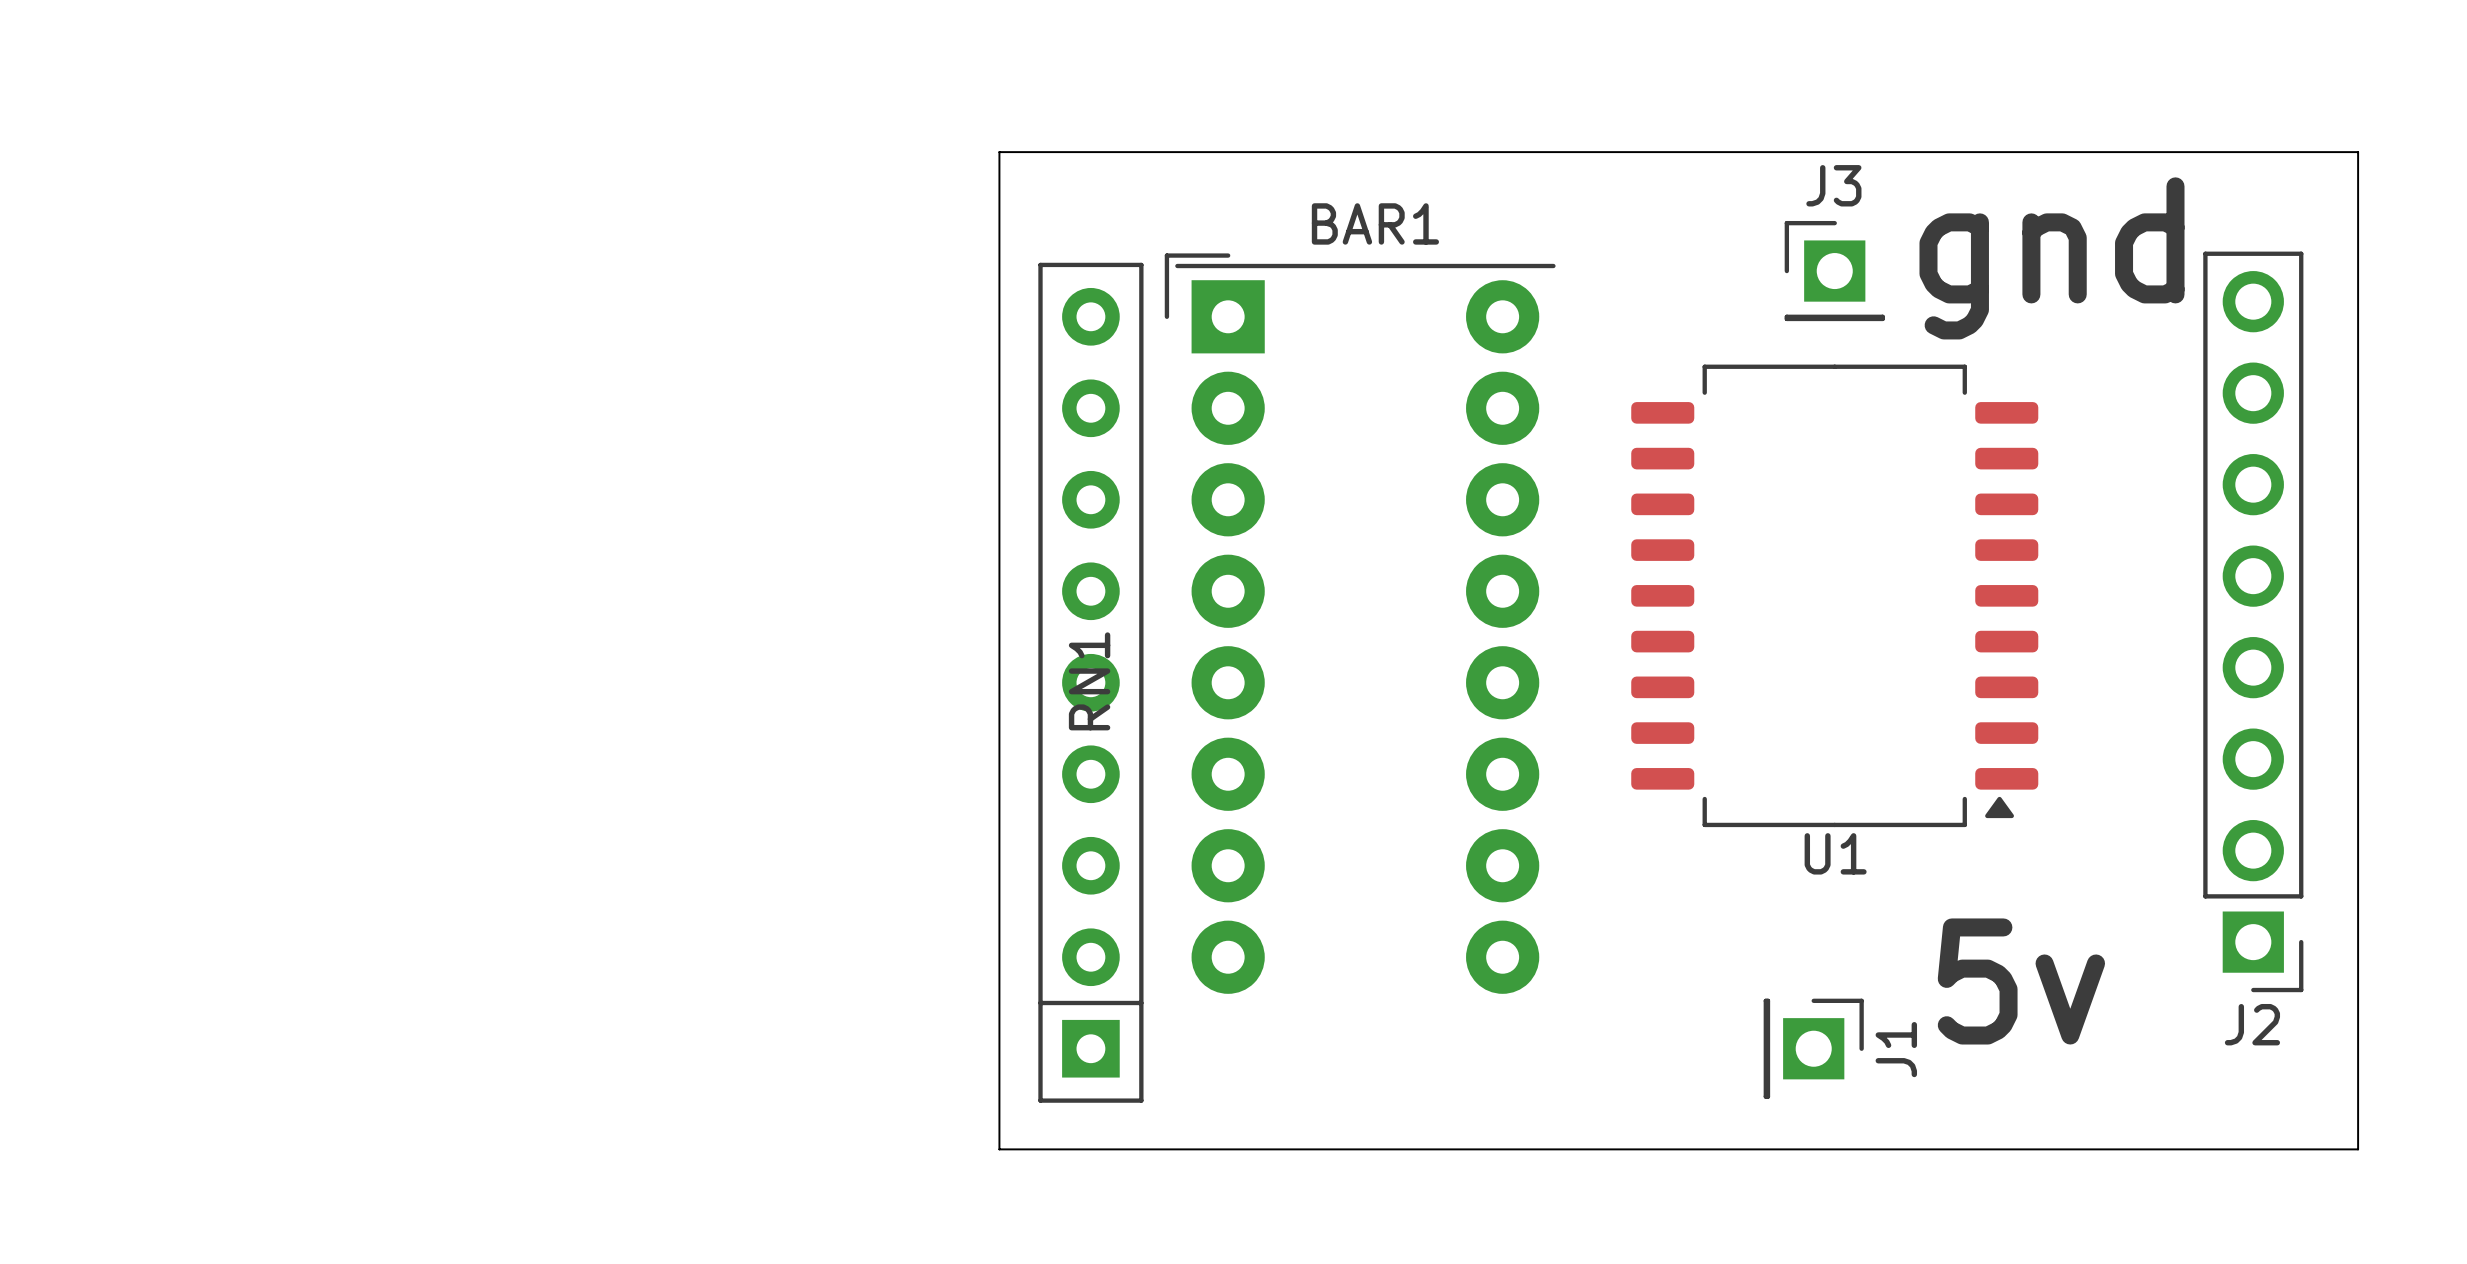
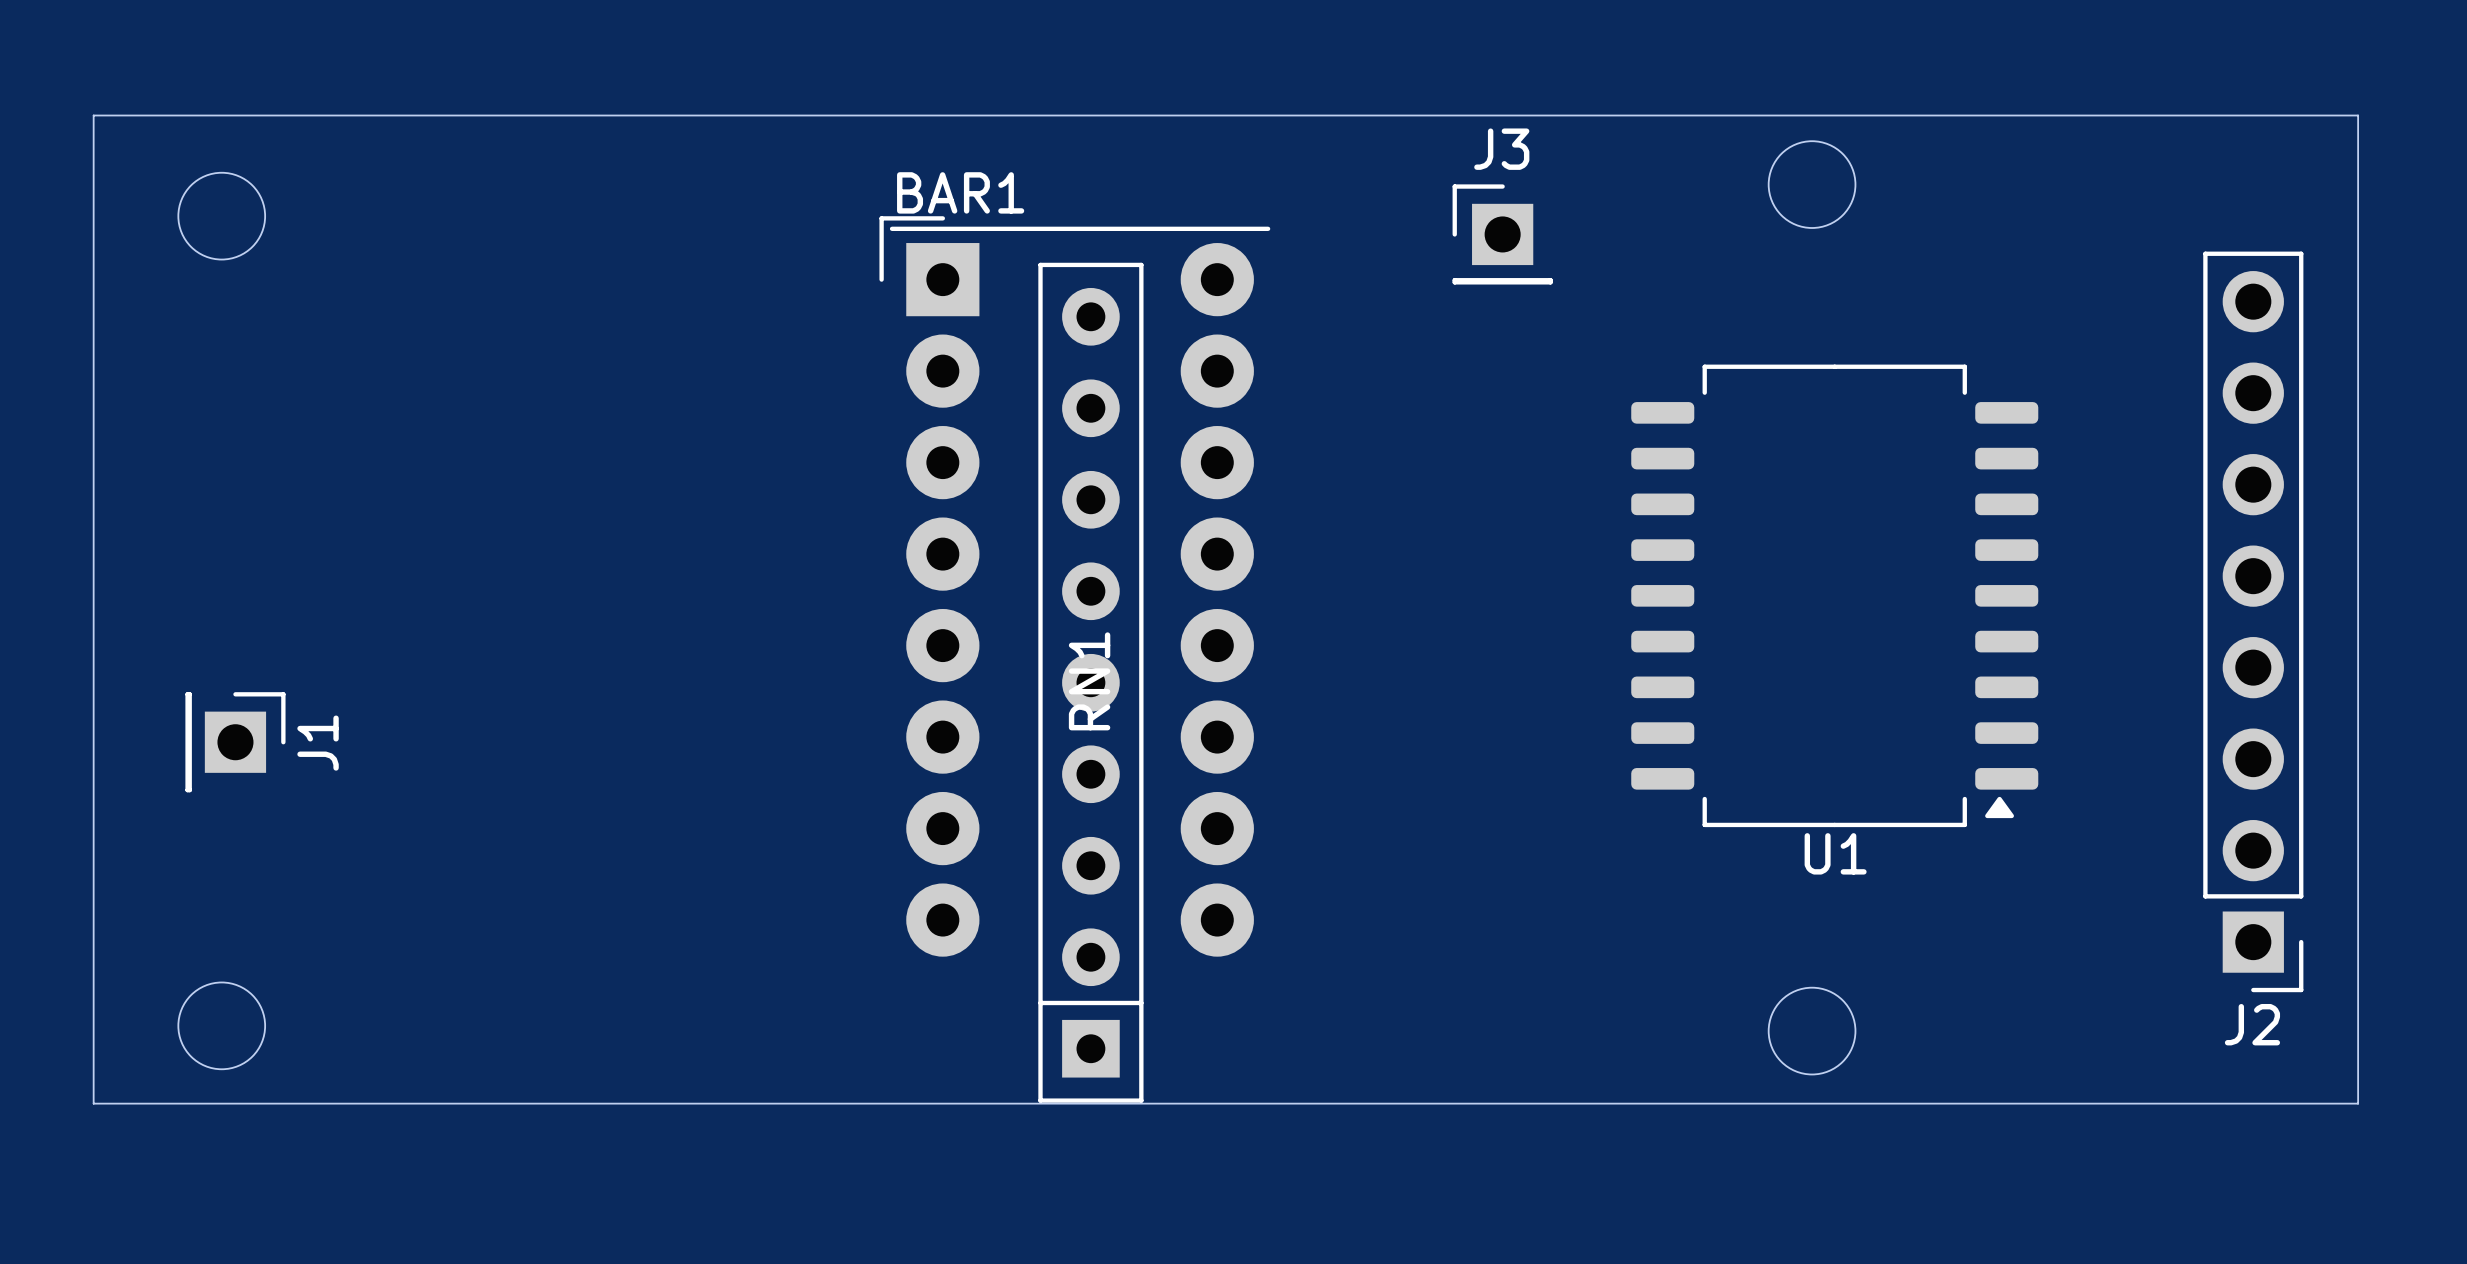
round board edge: none -> [1767, 140, 1857, 229]
board edge: (2358, 152) (999, 152) (999, 1149) (2358, 1149) (2358, 1103) -> (2358, 152) (2358, 115) (93, 115) (93, 1103) (2358, 1103)
round board edge: none -> [177, 171, 267, 261]
BAR1 name position: BAR1 (1375, 223) -> BAR1 (960, 192)
text: gnd (2051, 258) -> none
J3 position: (1834, 271) -> (1502, 234)
BAR1 position: (1360, 623) -> (1074, 586)
round board edge: none -> [177, 981, 267, 1071]
text: 5v (2021, 981) -> none
round board edge: none -> [1767, 986, 1857, 1076]
J1 position: (1813, 1048) -> (235, 742)

